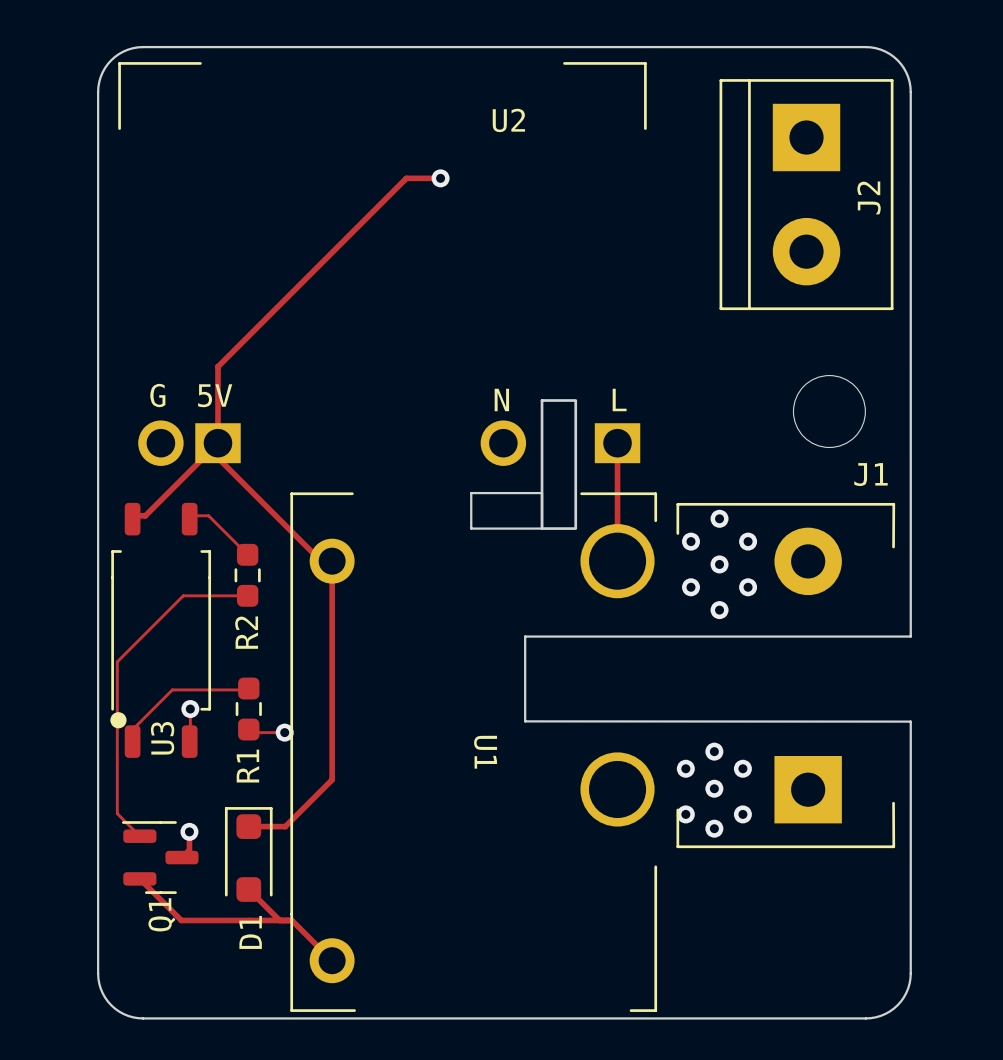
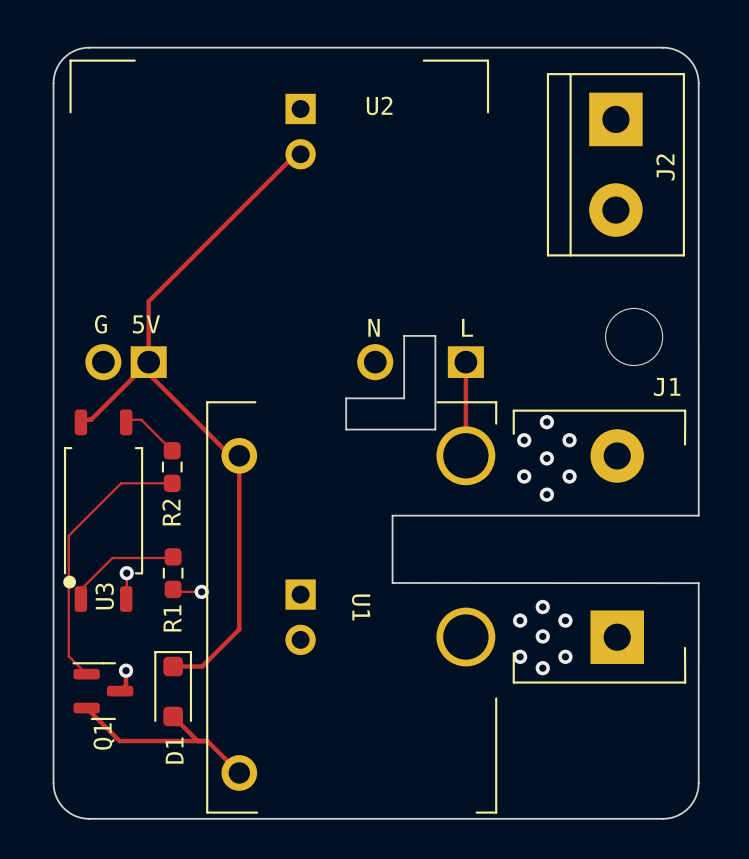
U2 footprint: [118, 62, 647, 530] -> [69, 59, 490, 381]
part: none -> (300, 131)
track: (406, 178) (440, 178) -> none
via: (440, 178) -> none
board edge: none -> (404, 335) (435, 335) (435, 429) (346, 429) (346, 398) (404, 398) (404, 335)
board edge: (471, 493) (542, 493) (542, 528) (471, 528) (471, 493) -> none
part: none -> (300, 617)

